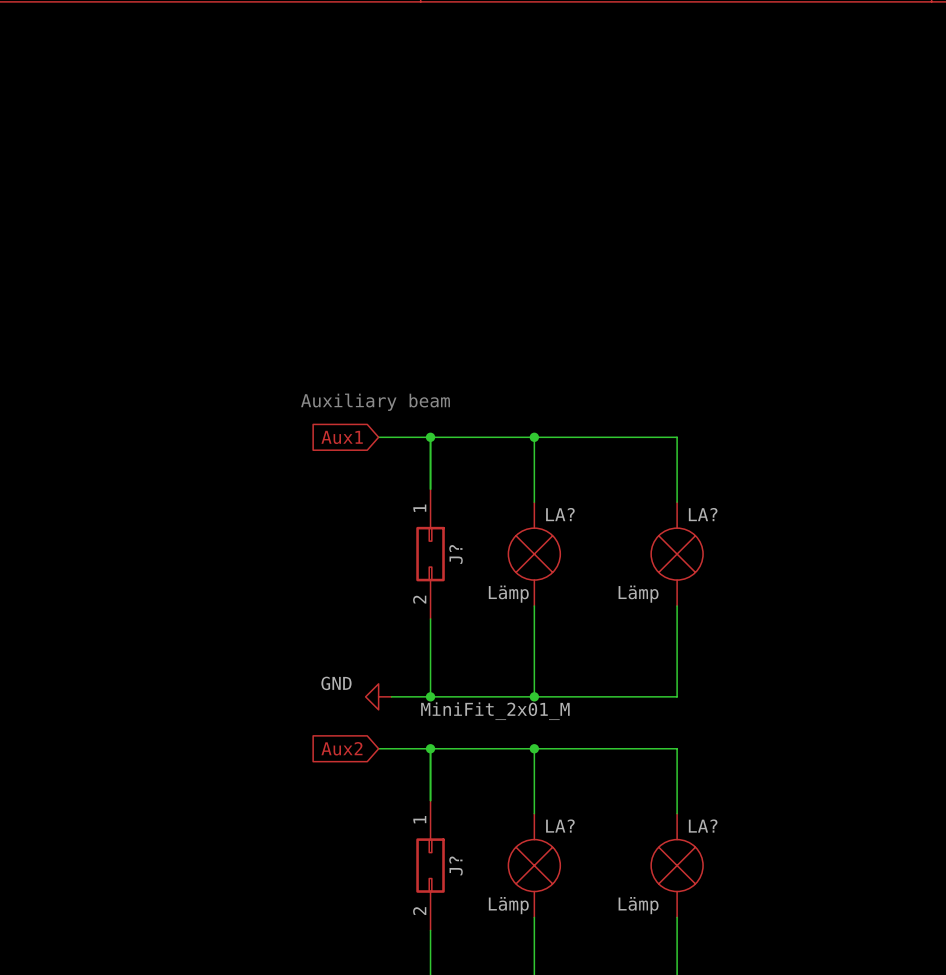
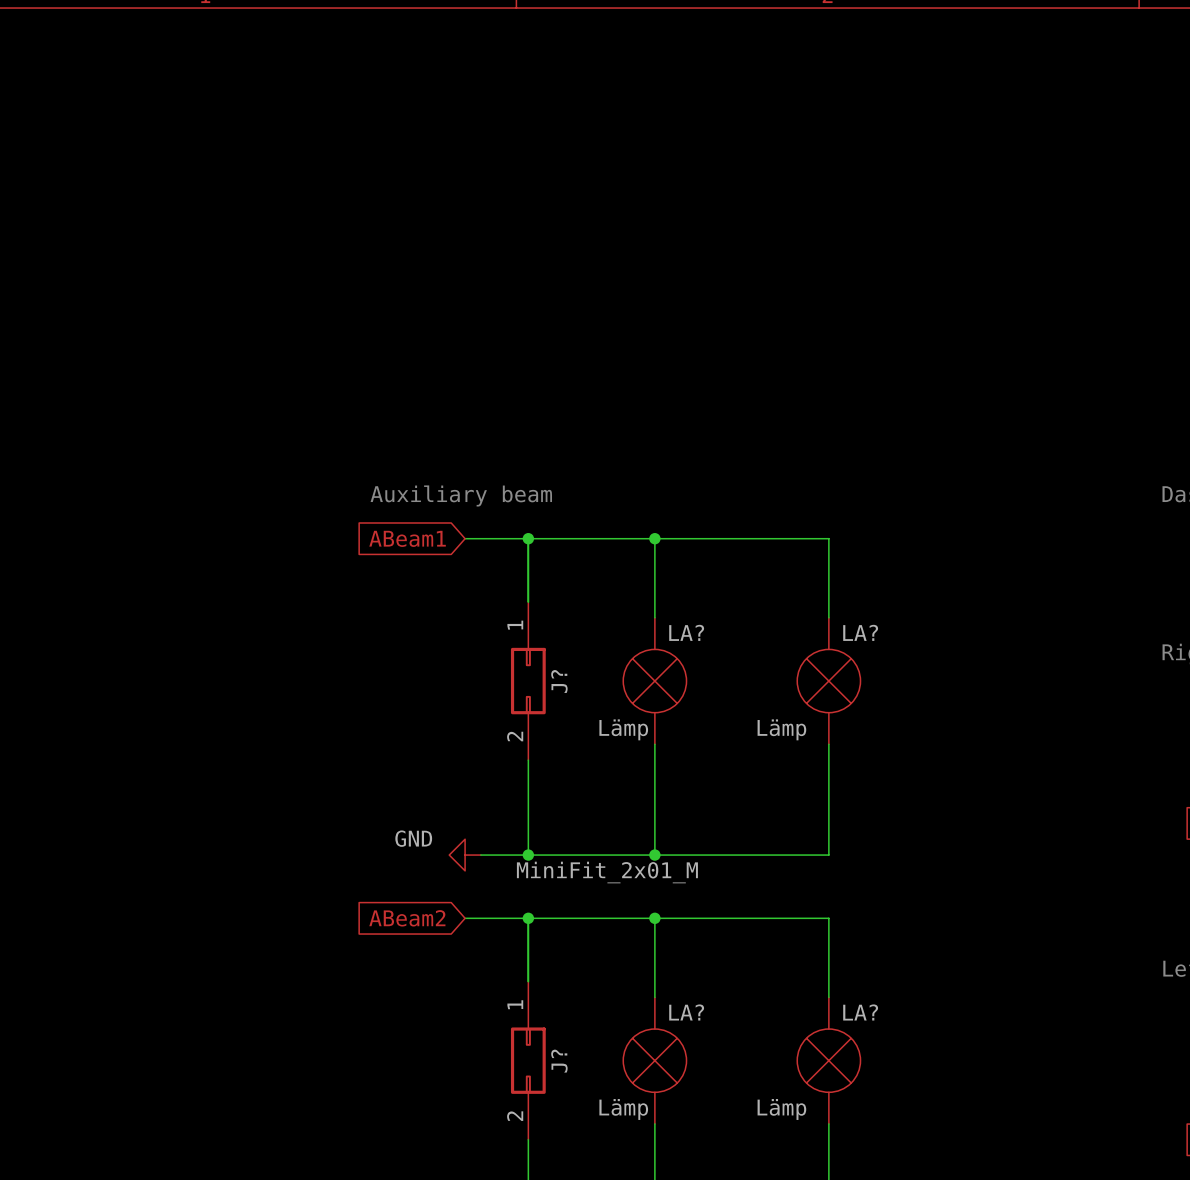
global label: Aux1 (342, 437) -> ABeam1 (407, 538)
global label: Aux2 (341, 748) -> ABeam2 (407, 918)

